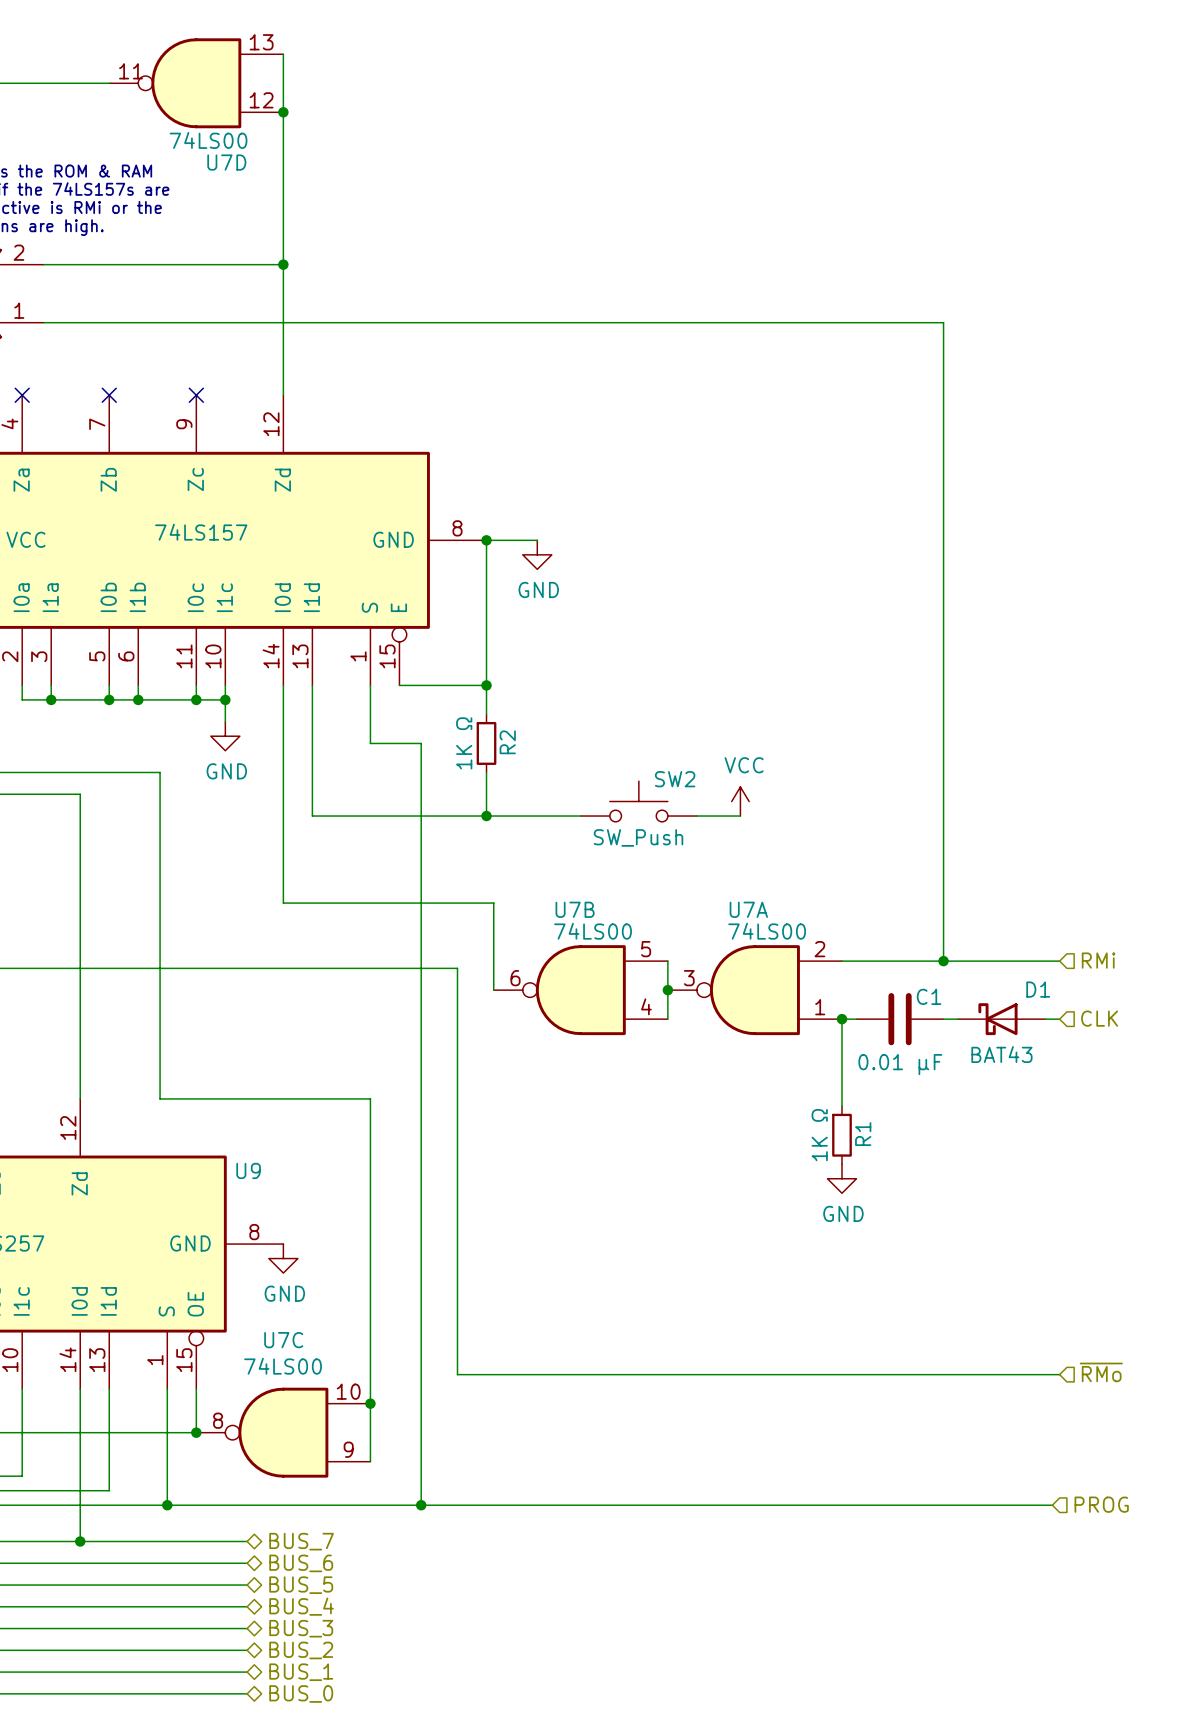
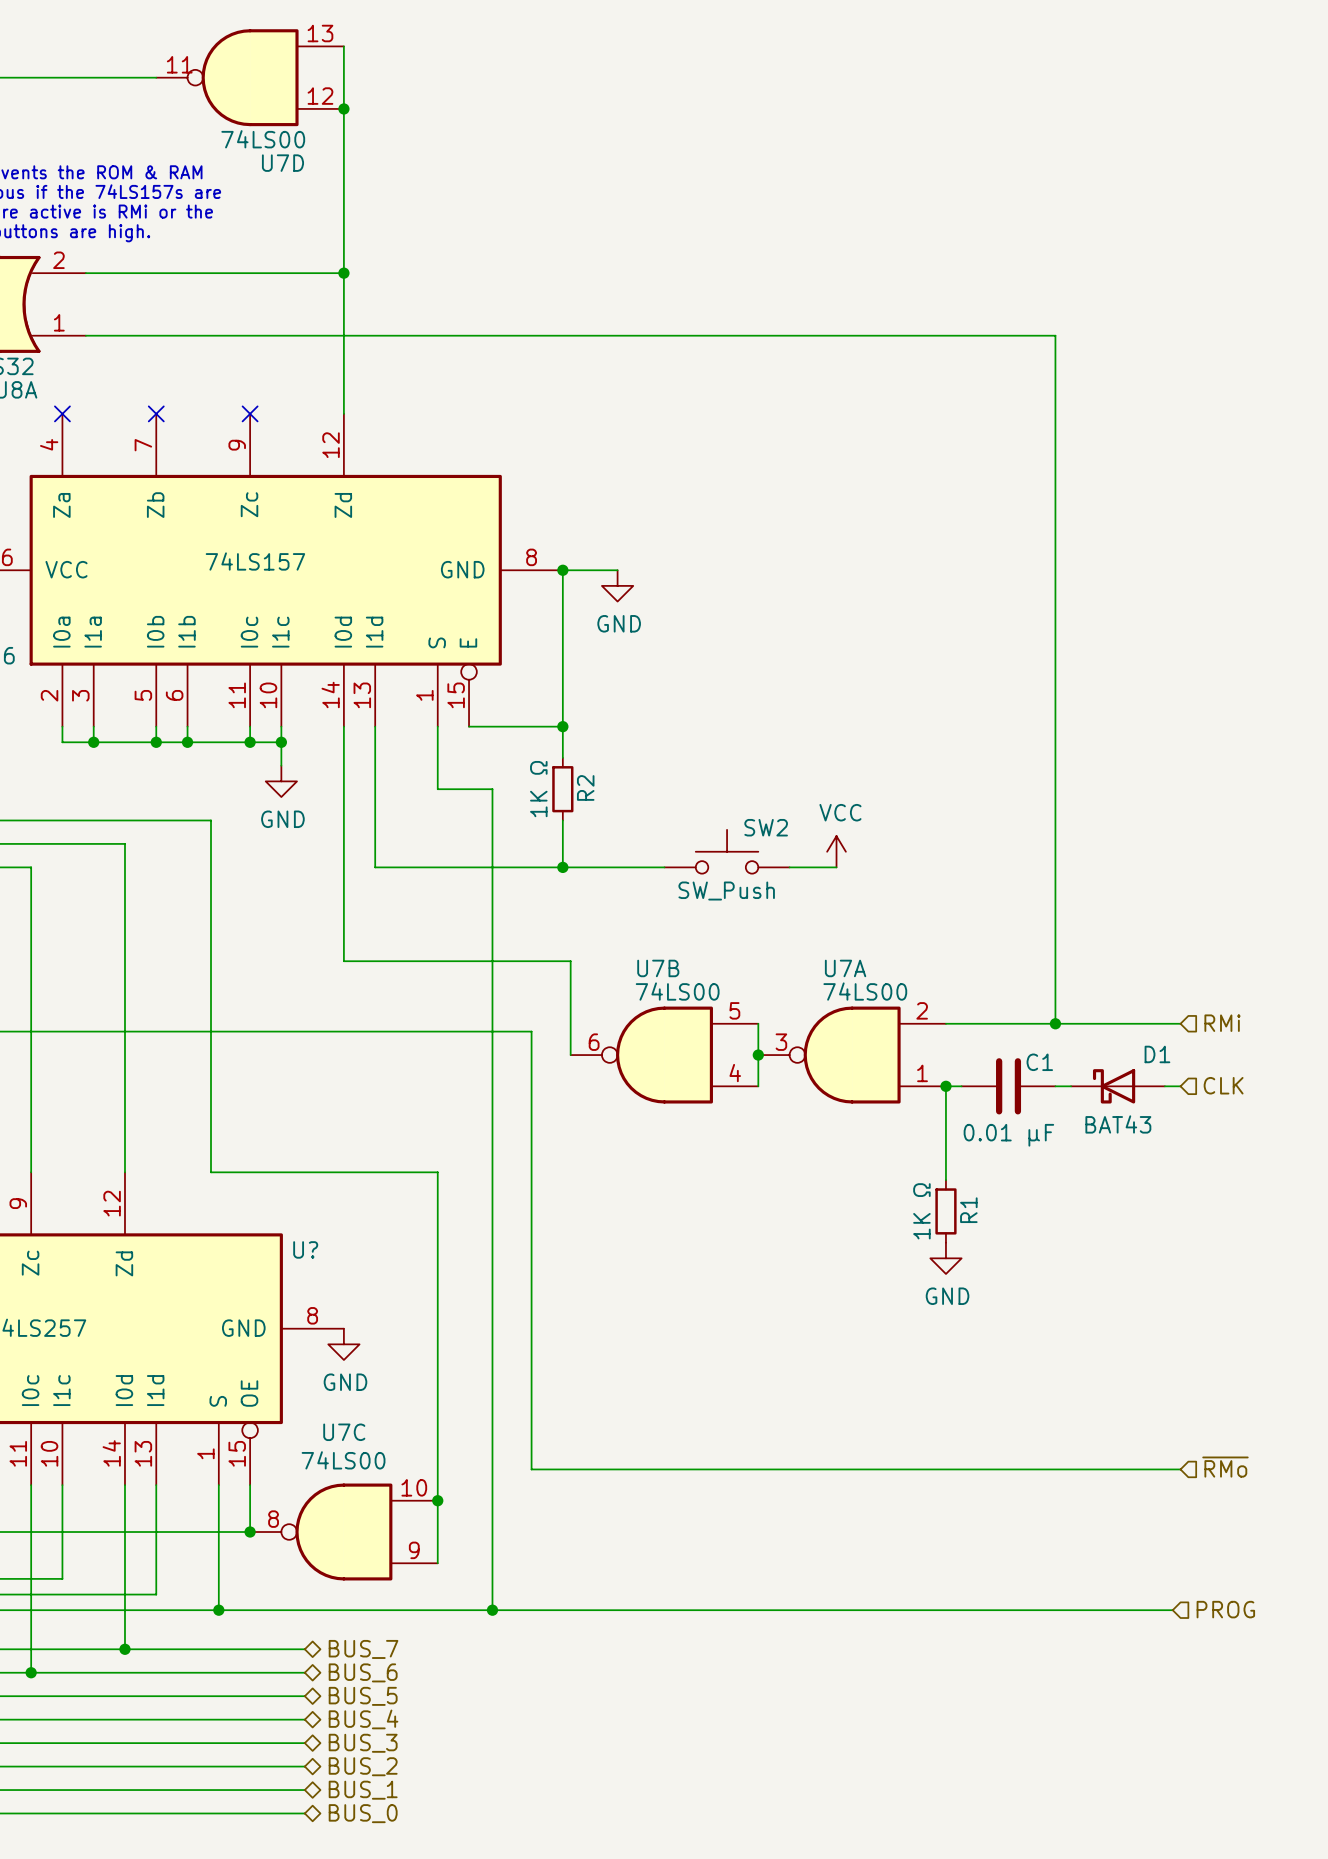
U9 name: U9 (248, 1170) -> U? (305, 1249)

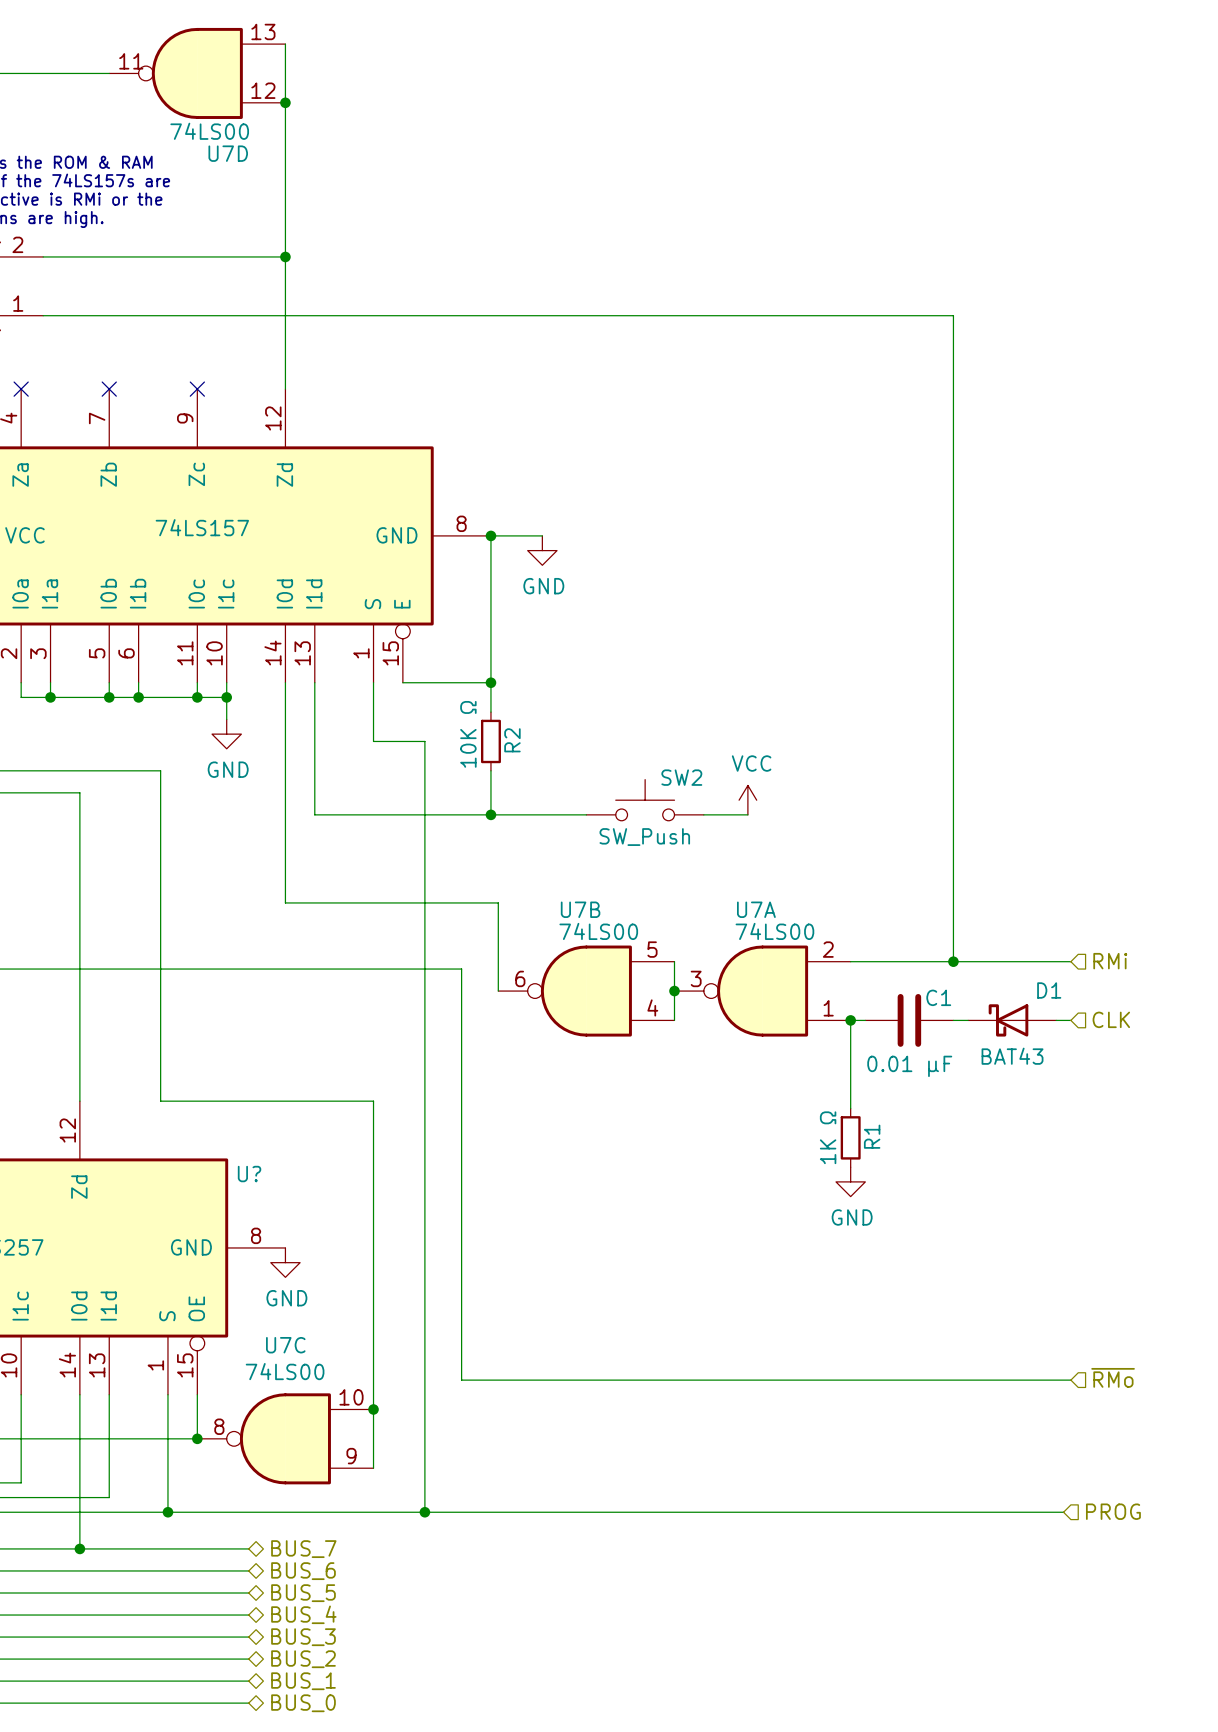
R2 value: 1K Ω (538, 789) -> 10K Ω (468, 734)

